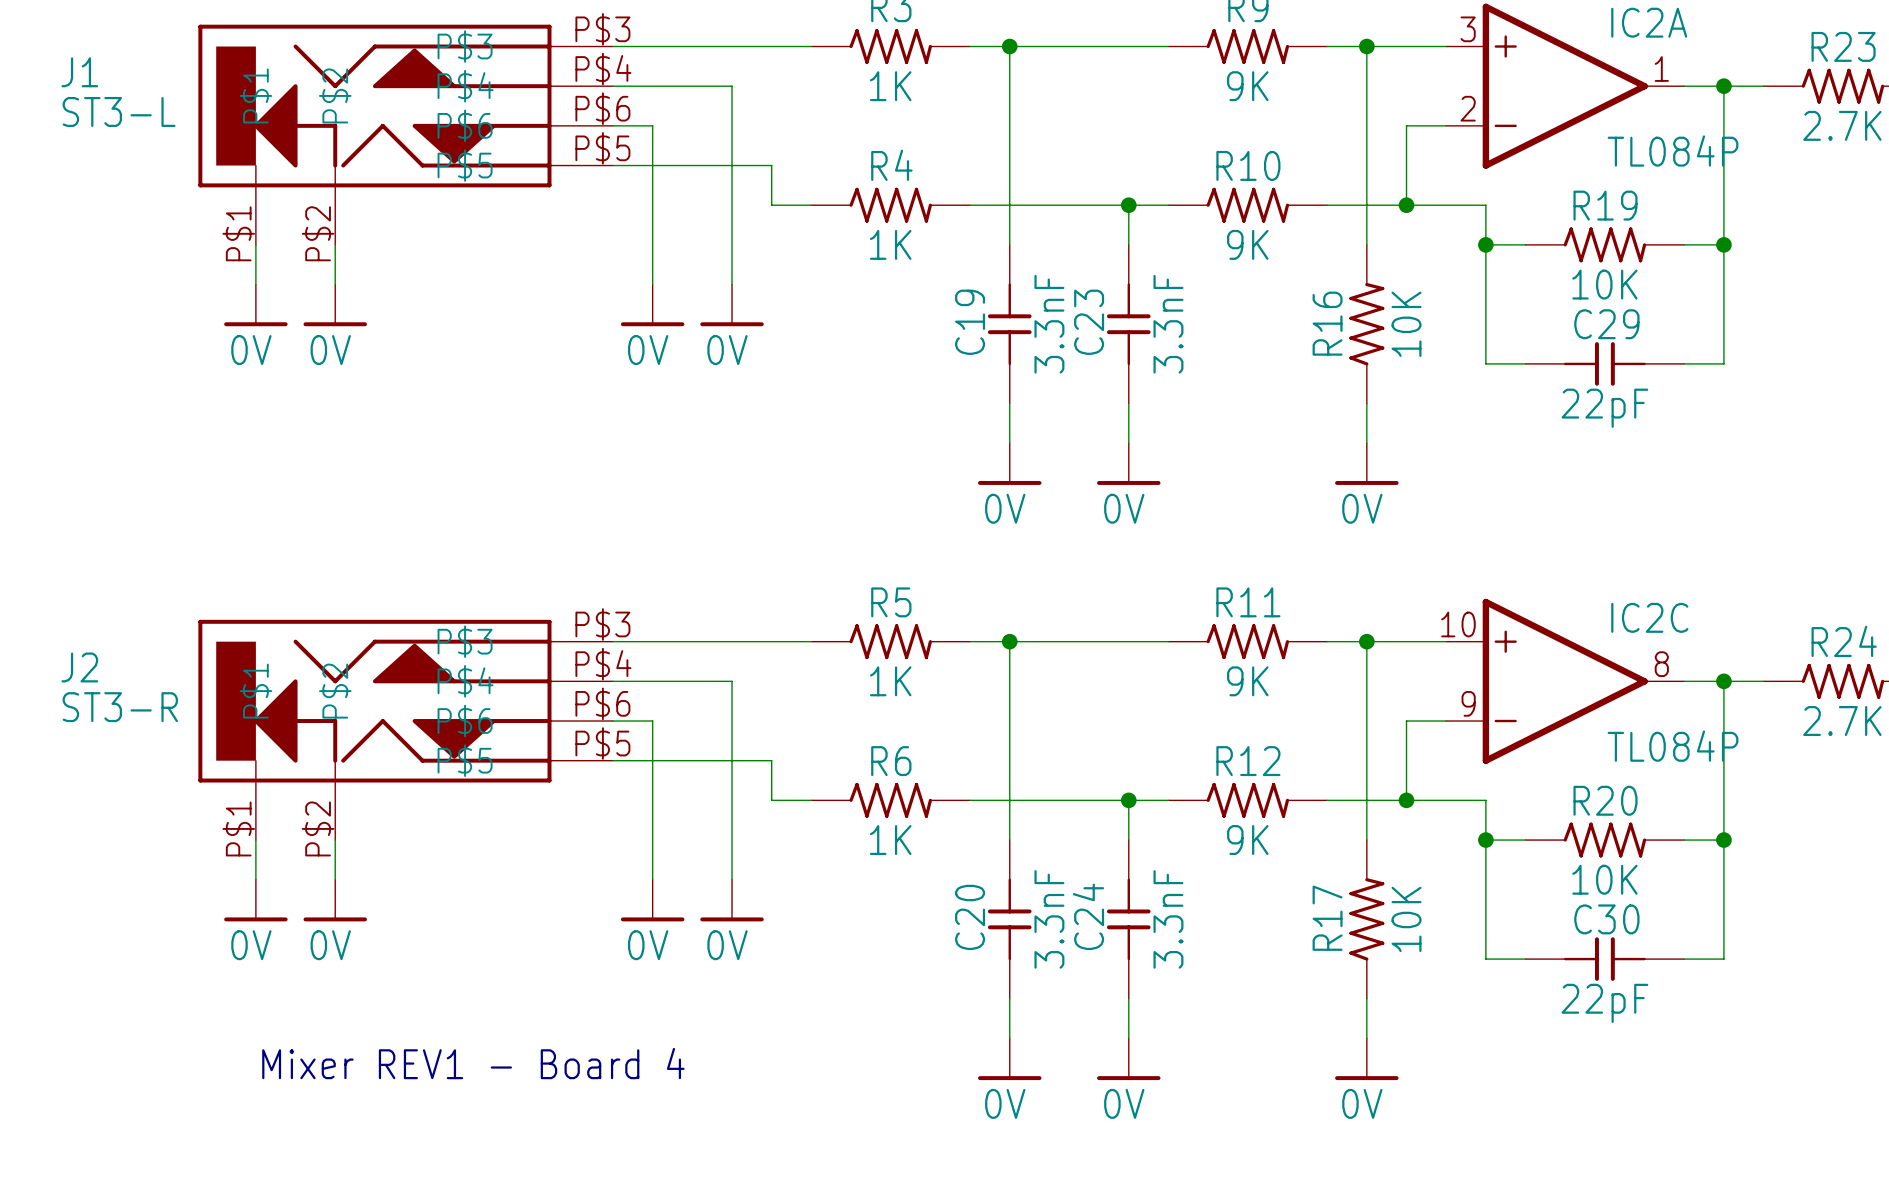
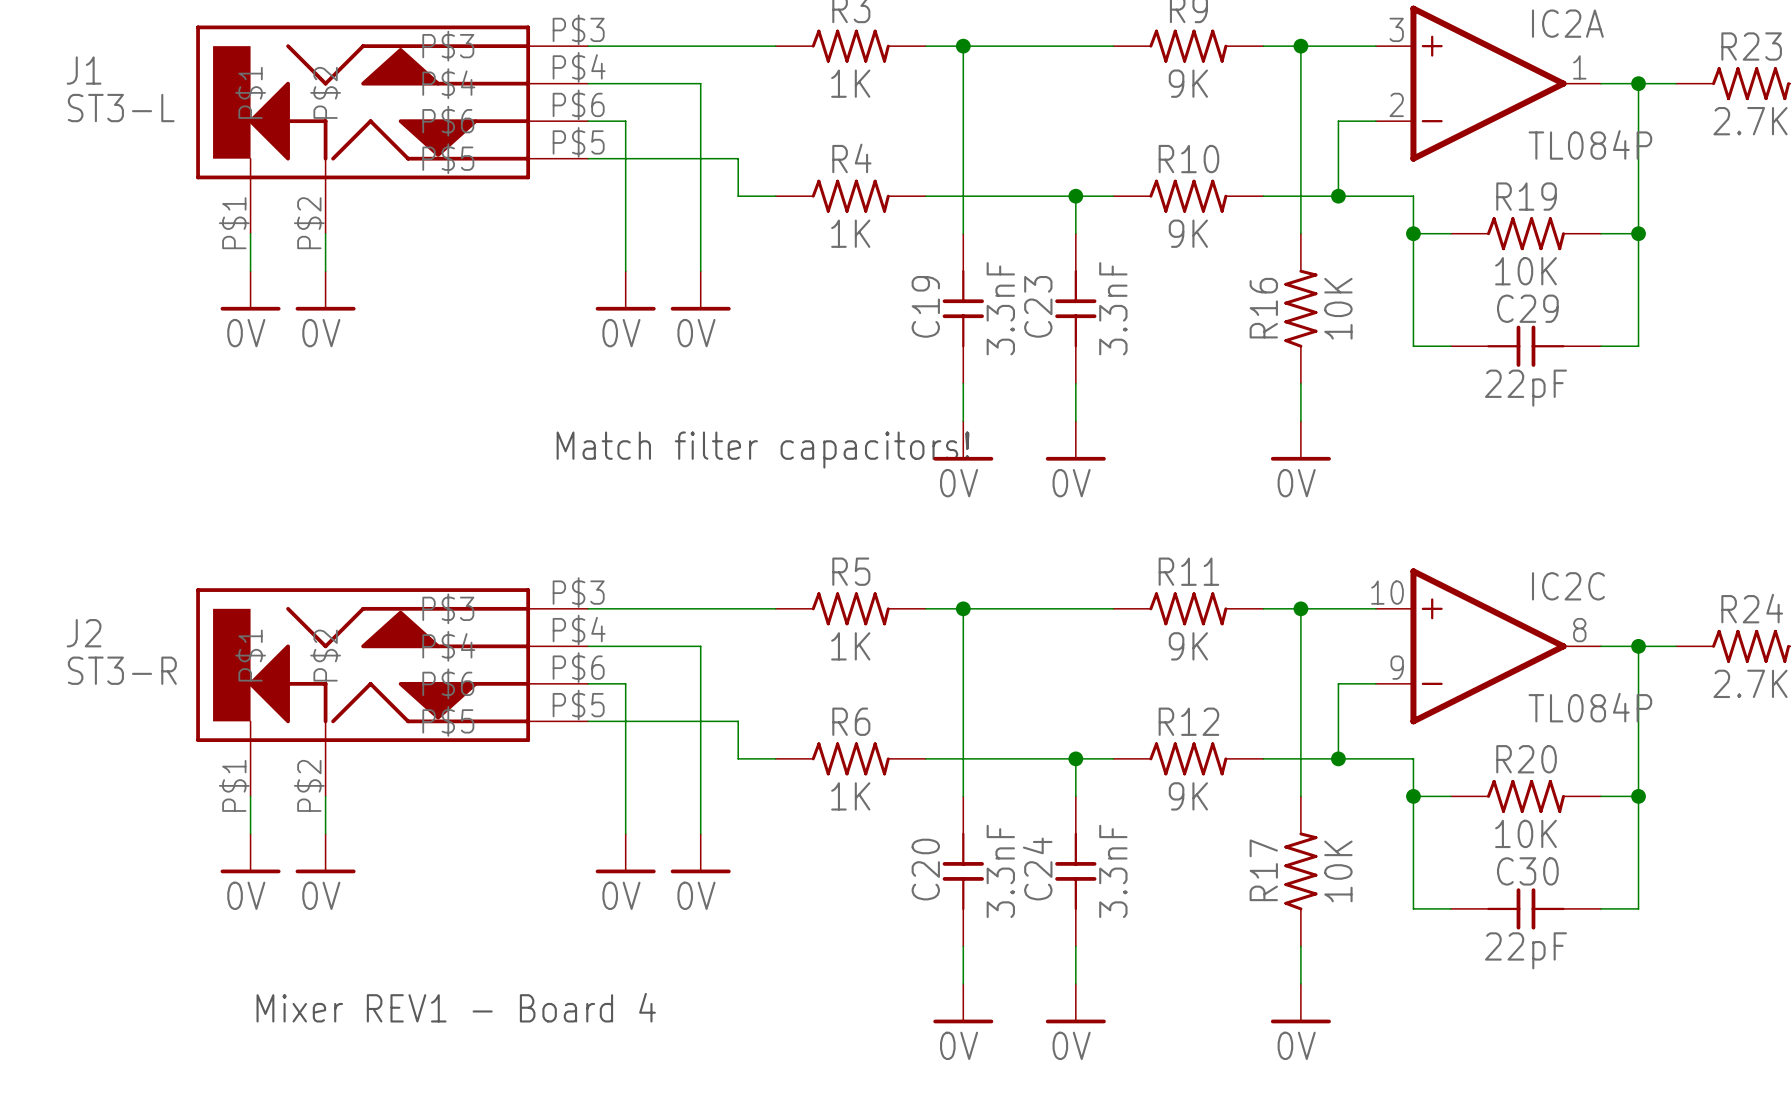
text: none -> Match filter capacitors! (763, 450)

